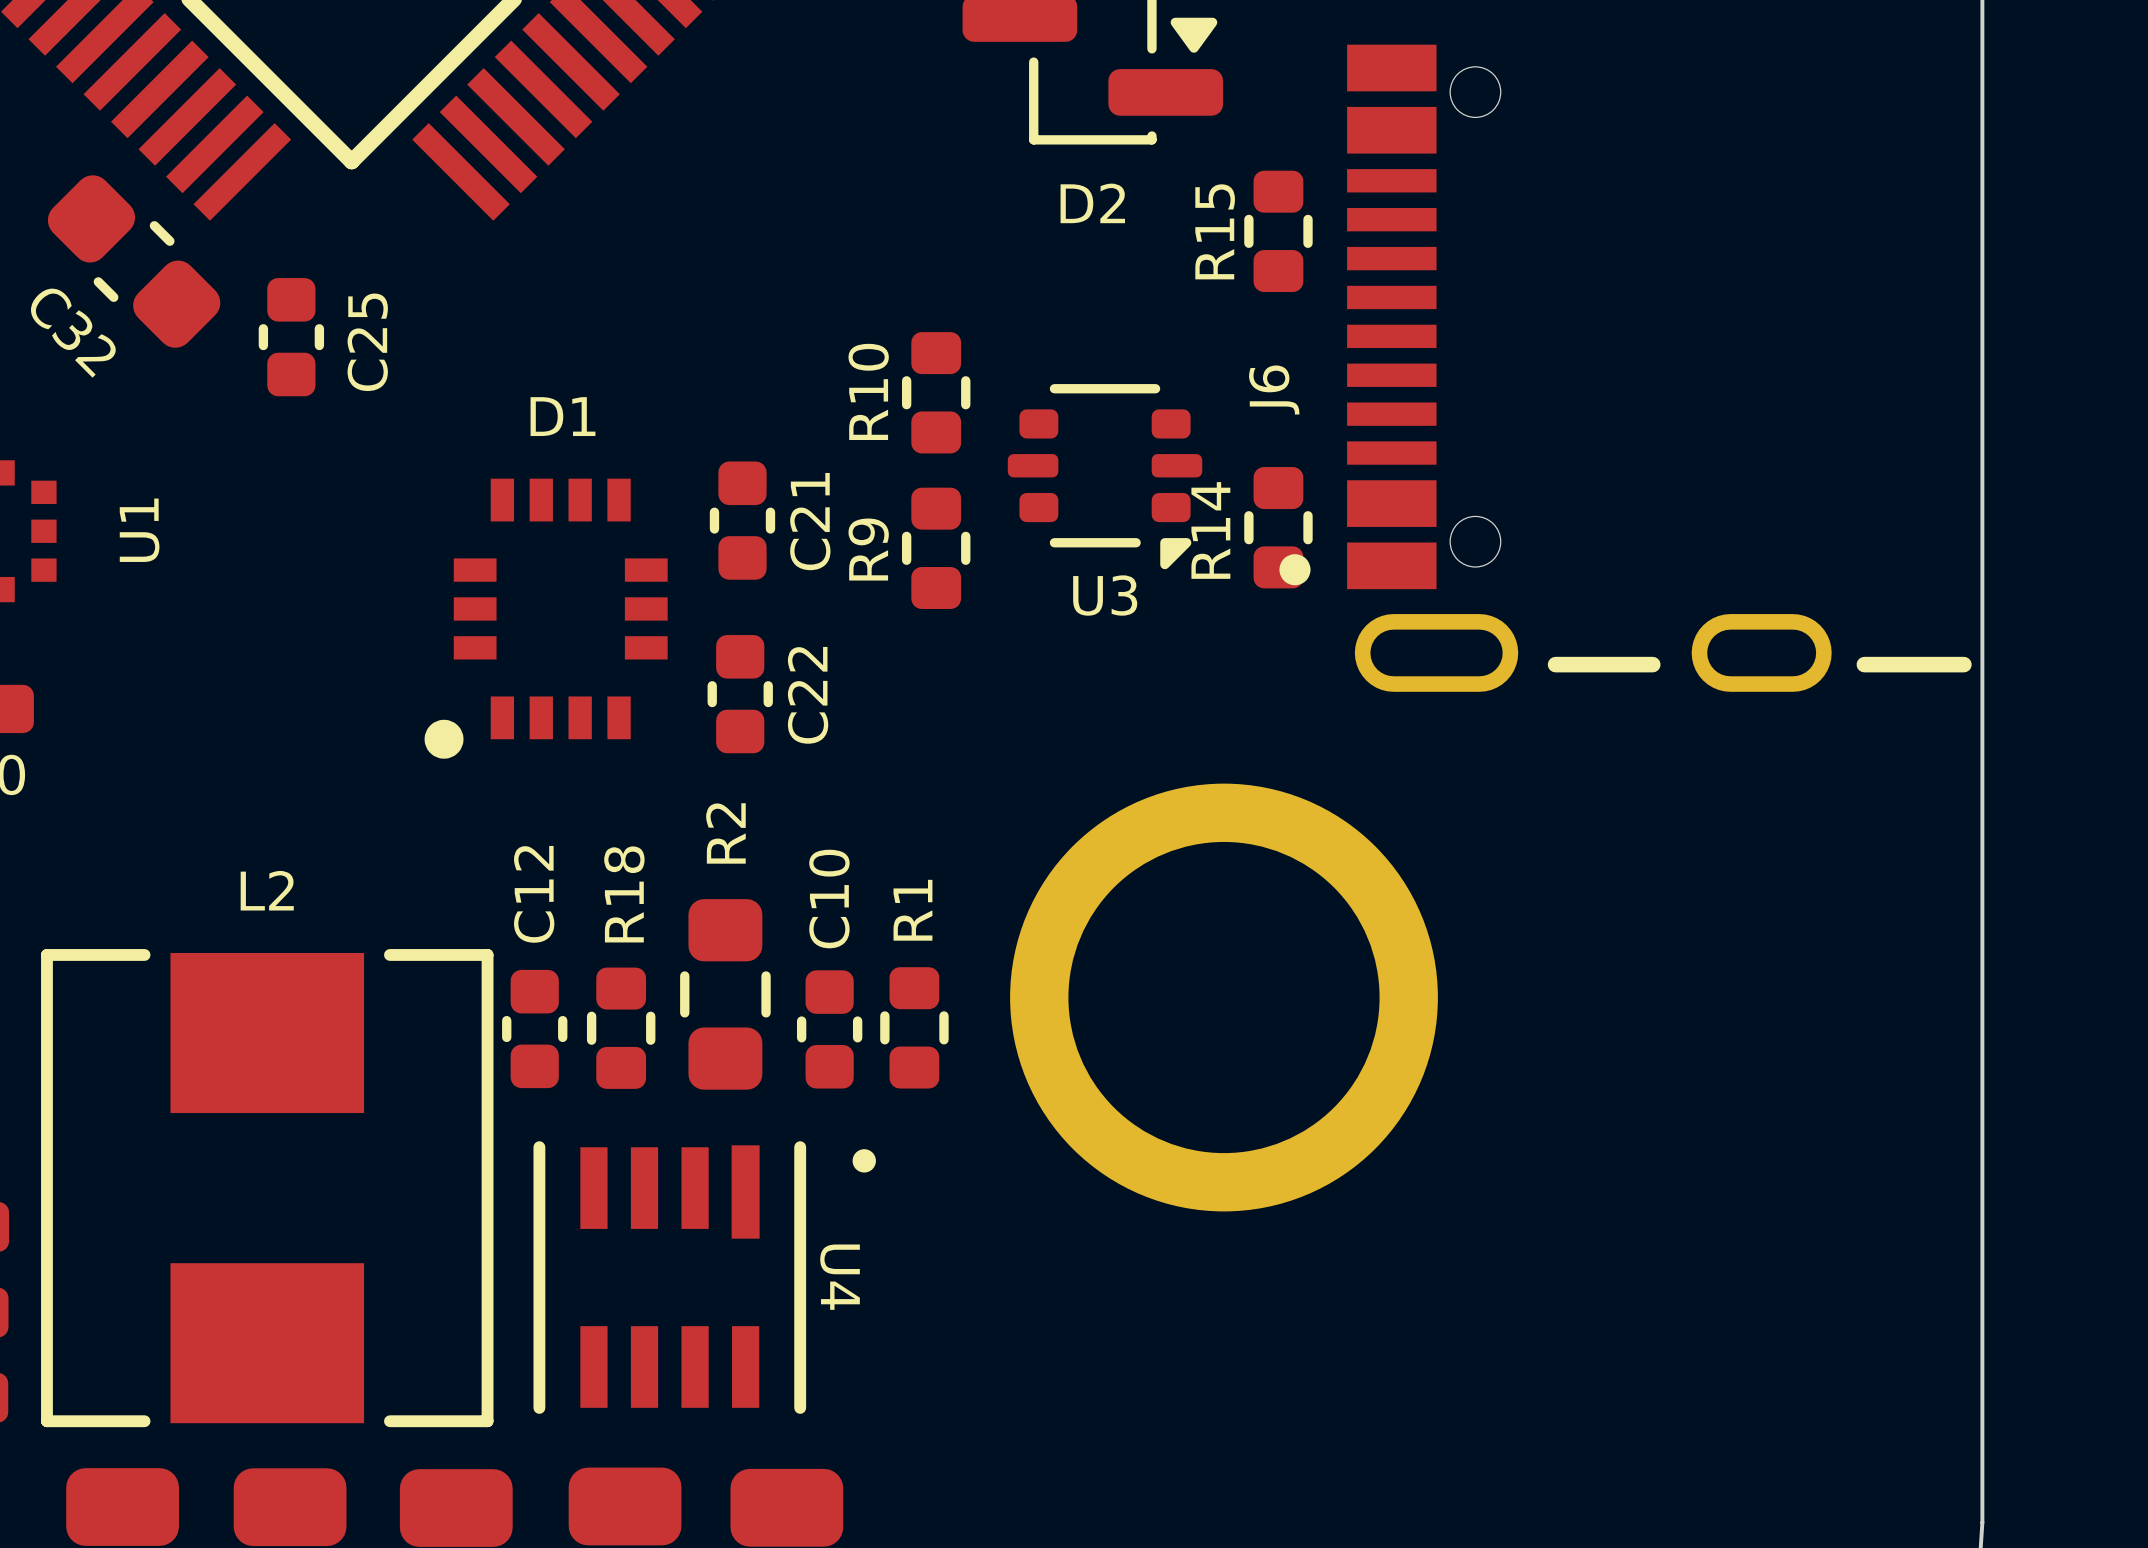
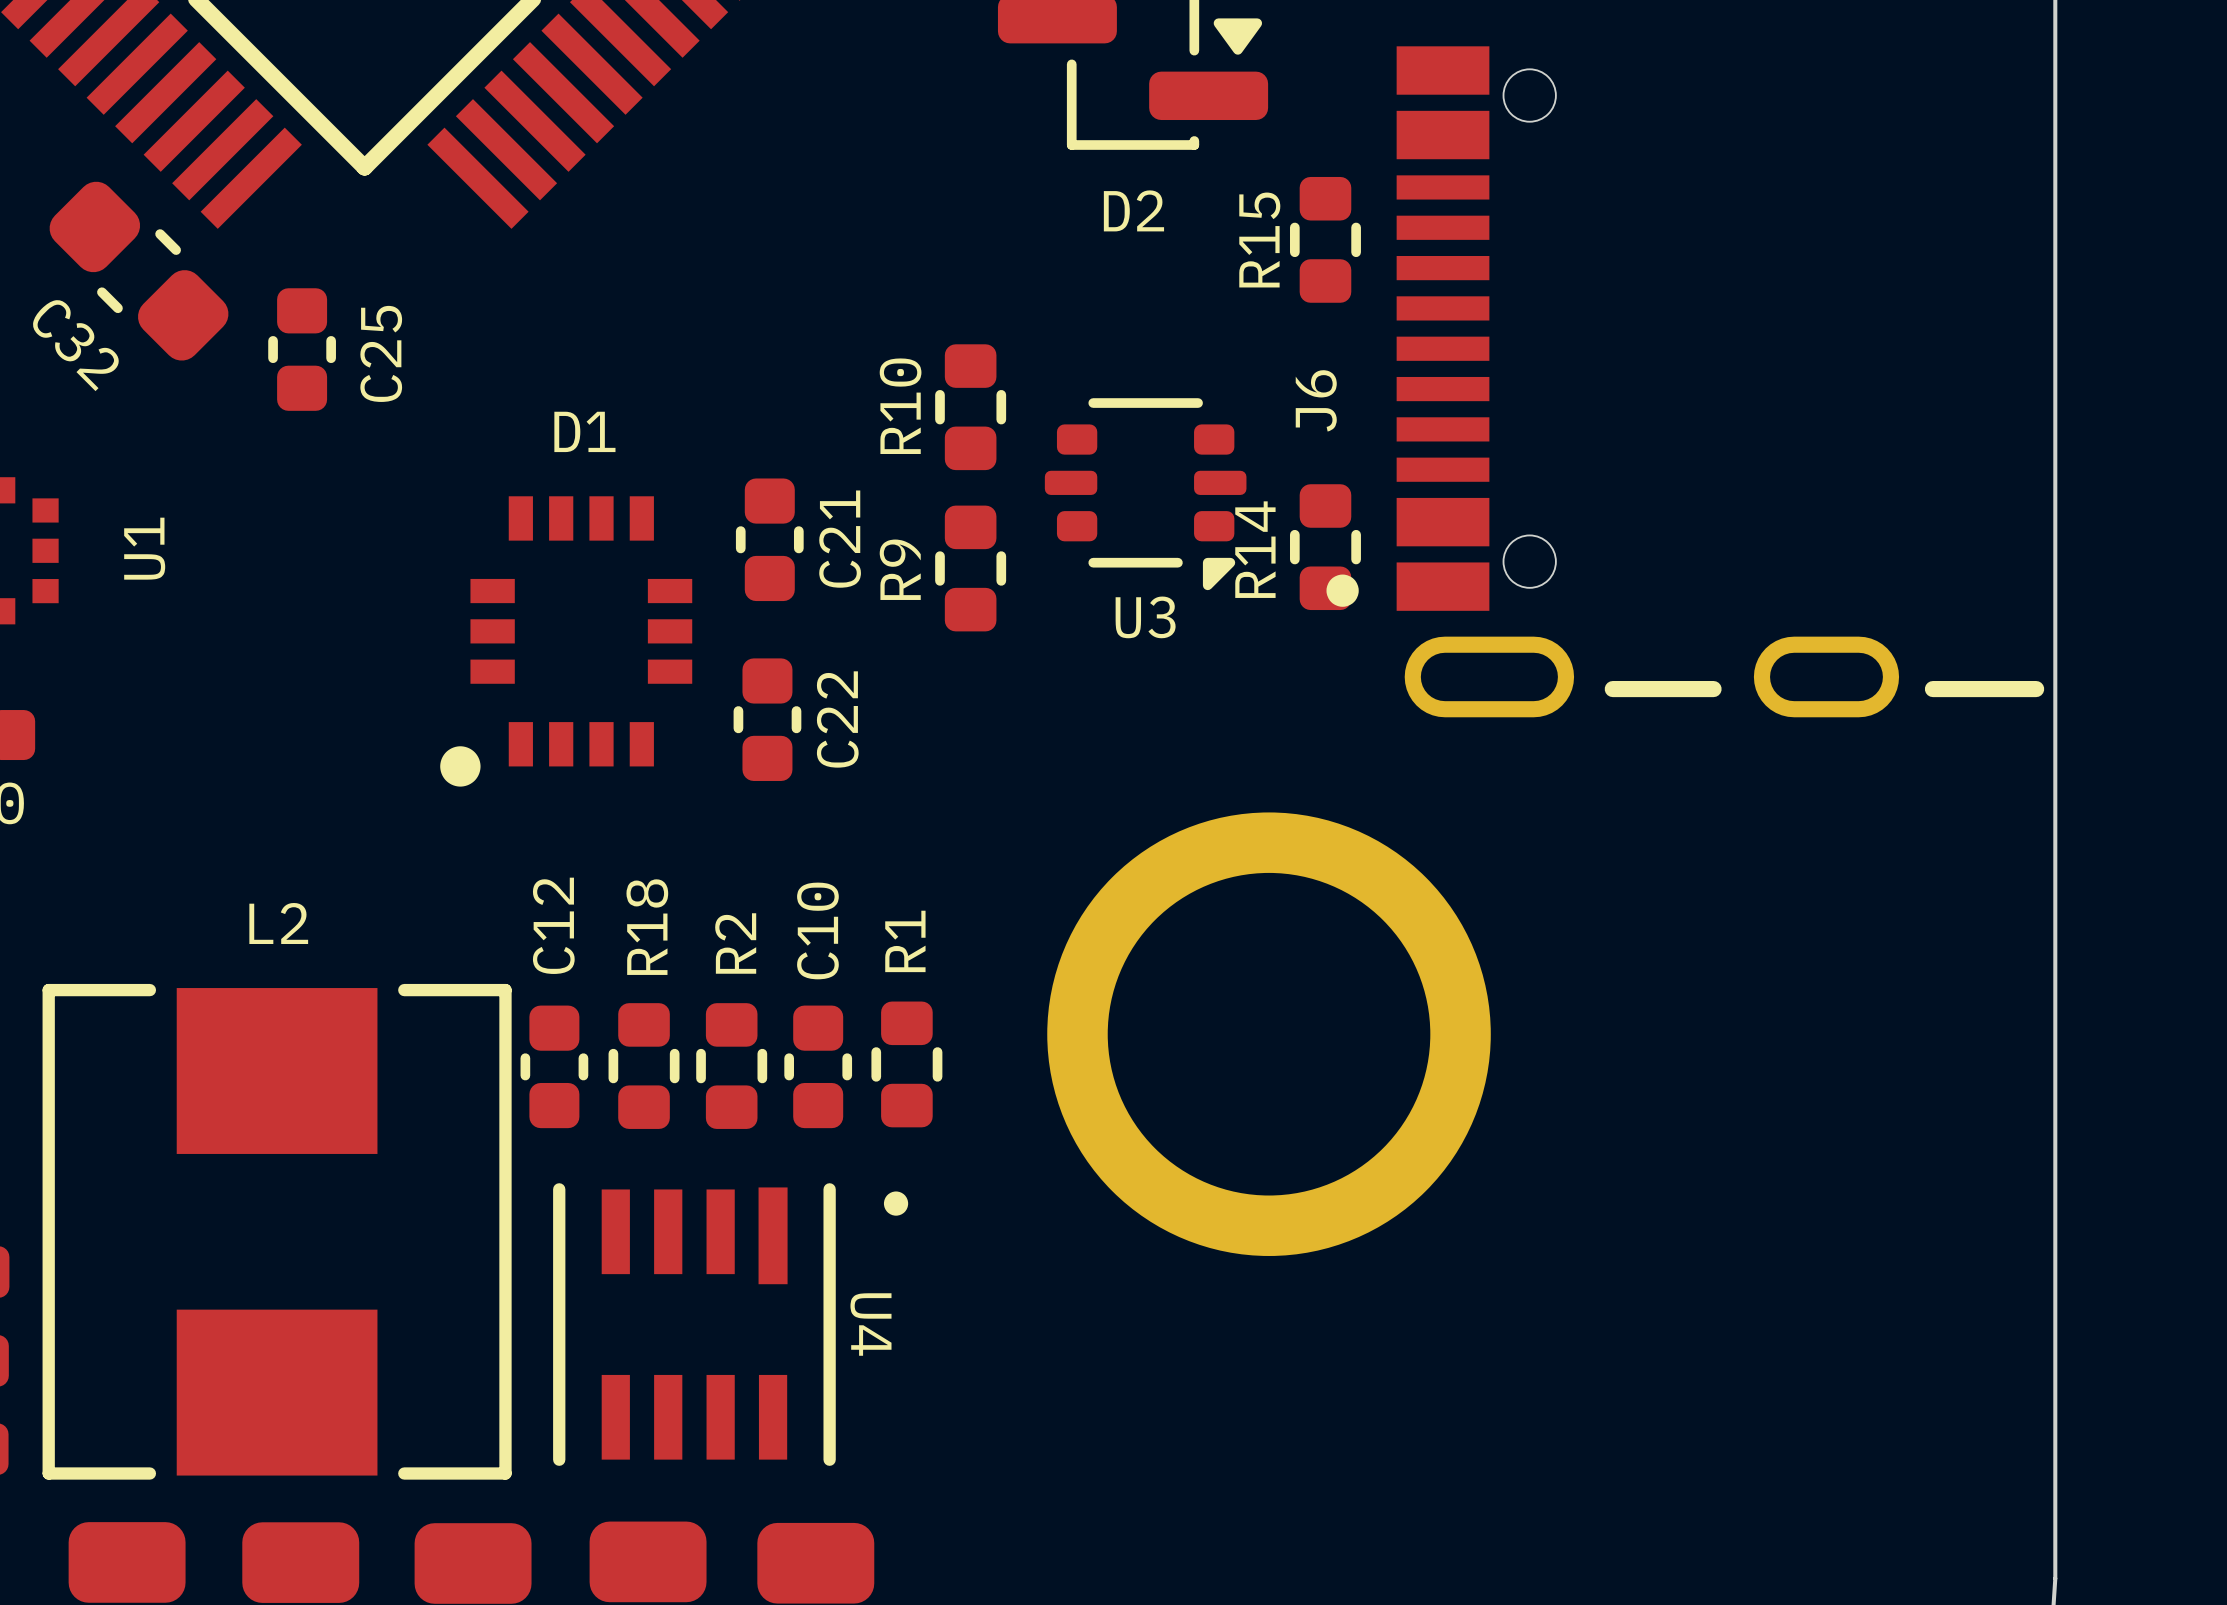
R2 name position: R2 (725, 833) -> R2 (735, 943)
R2 footprint: [680, 899, 771, 1090] -> [696, 1003, 768, 1129]
R1 position: (914, 1027) -> (906, 1064)
C10 position: (829, 1029) -> (818, 1066)

